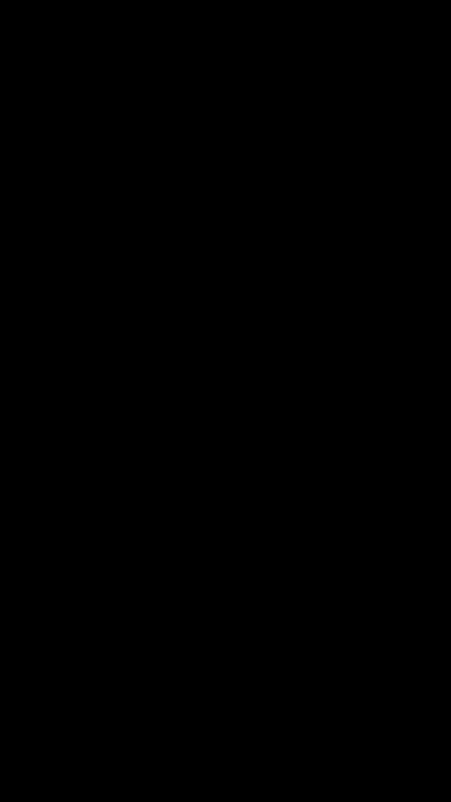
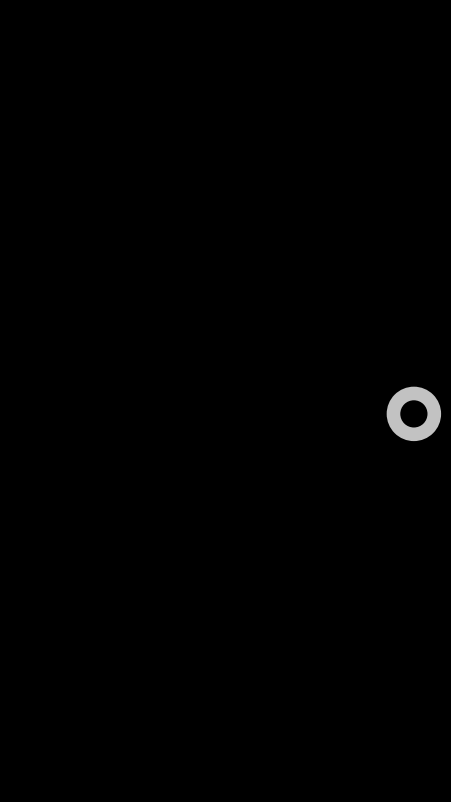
via: none -> (413, 413)

